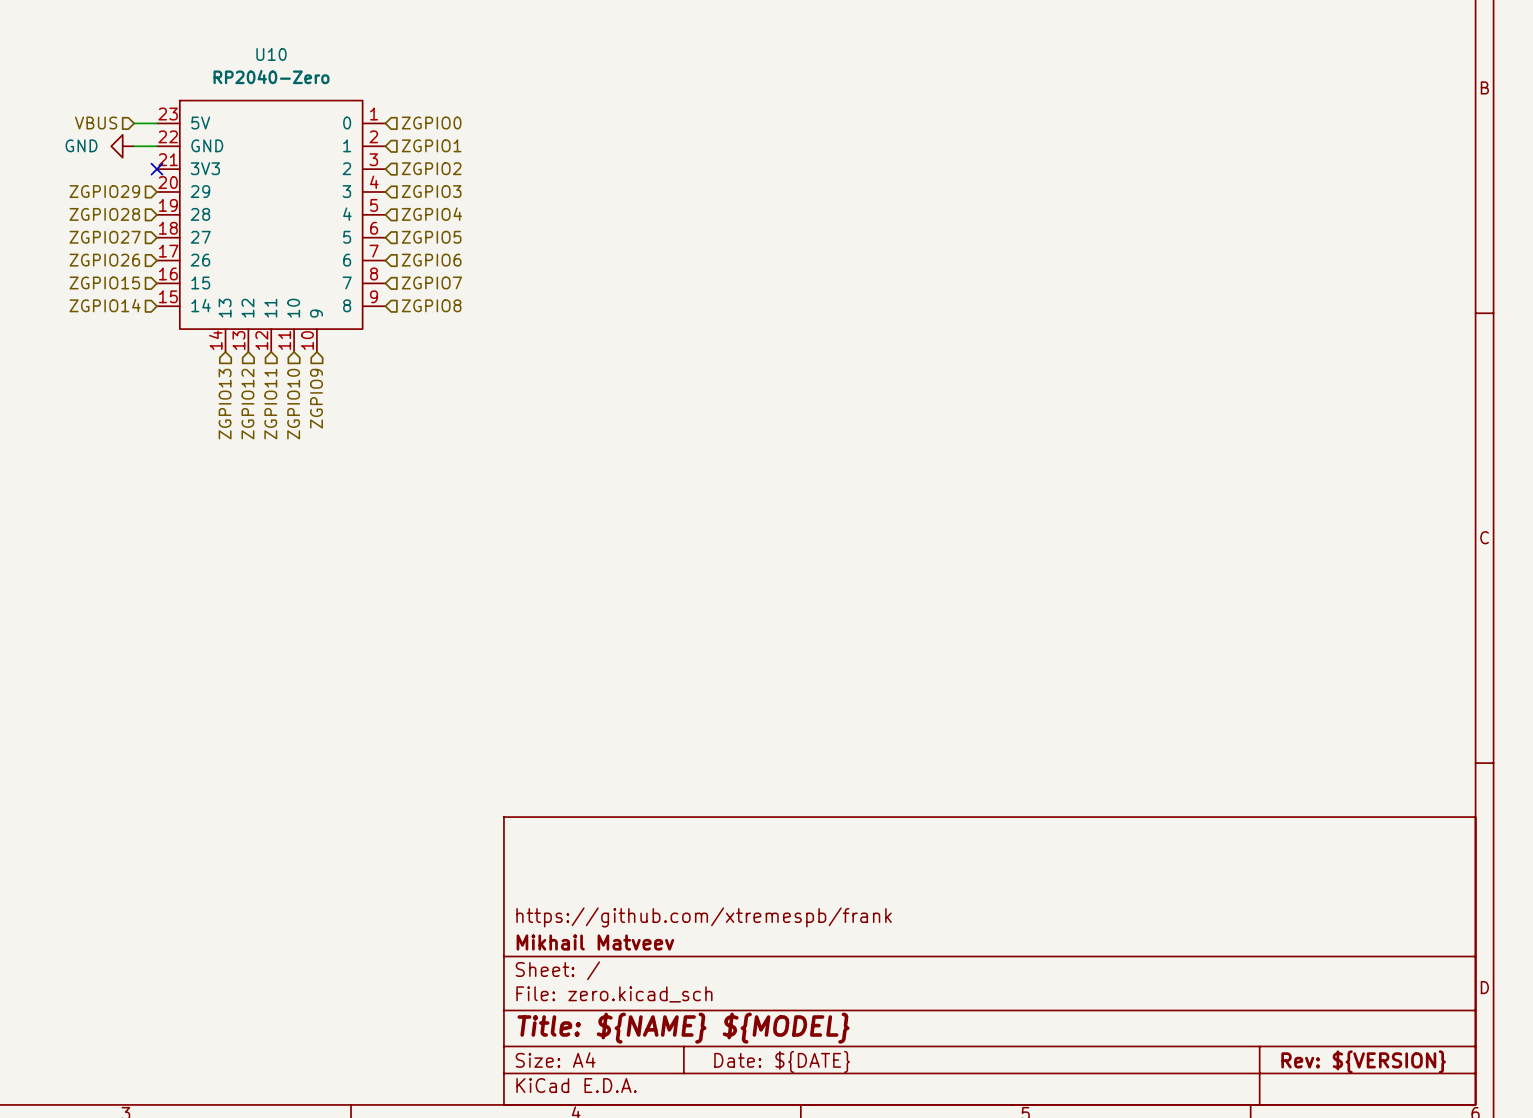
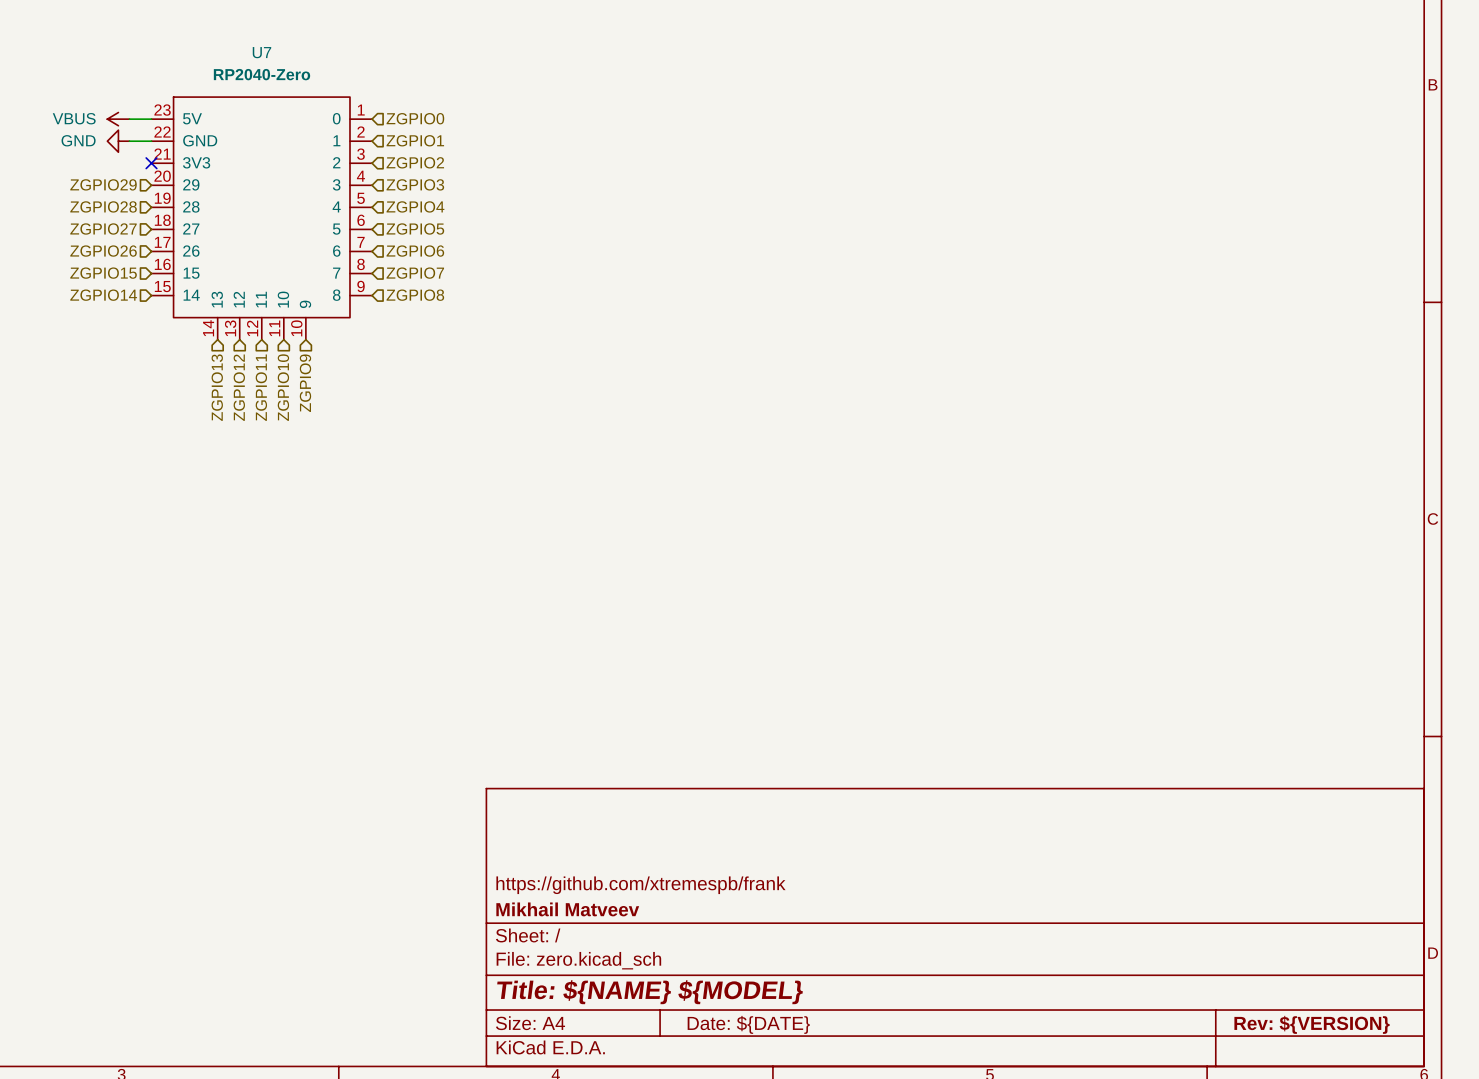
U10 name: U10 (271, 54) -> U7 (261, 52)
hierarchical label: VBUS (96, 123) -> none
power symbol: none -> VBUS (118, 119)

